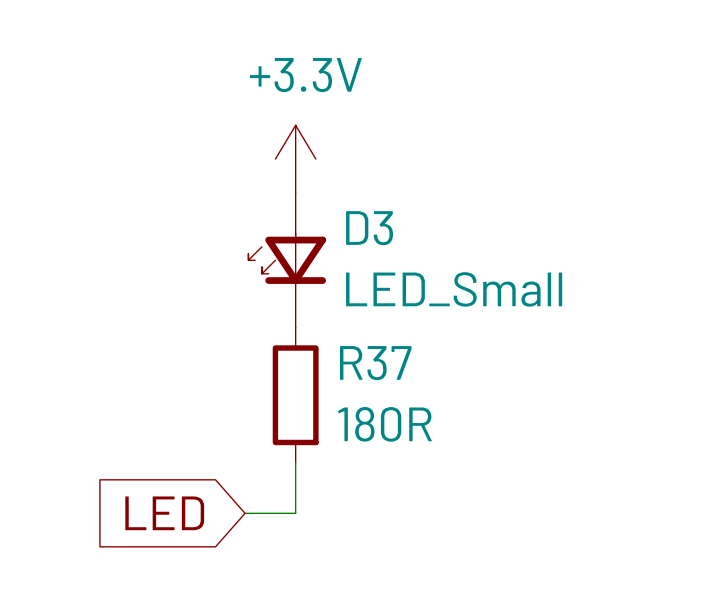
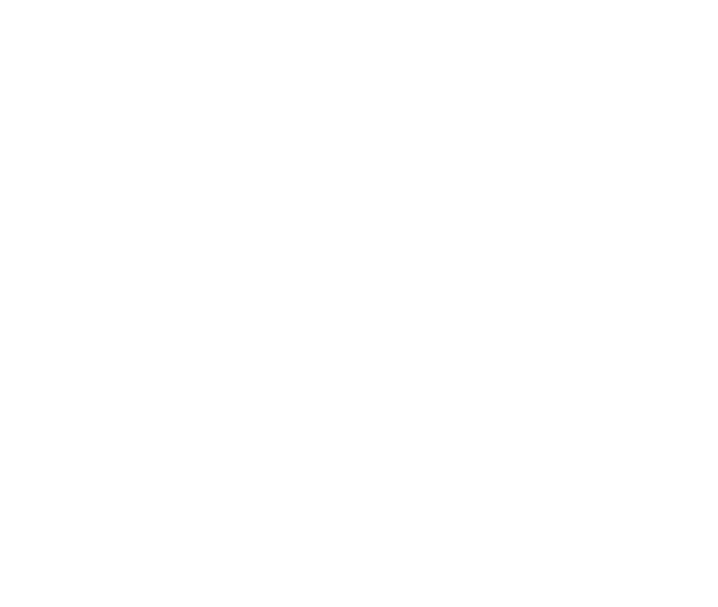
power symbol: +3.3V (295, 159) -> none
D3: LED_Small (287, 260) -> none
R37: 180R (295, 395) -> none
wire: (295, 462) (295, 513) (245, 513) -> none
global label: LED (164, 513) -> none

